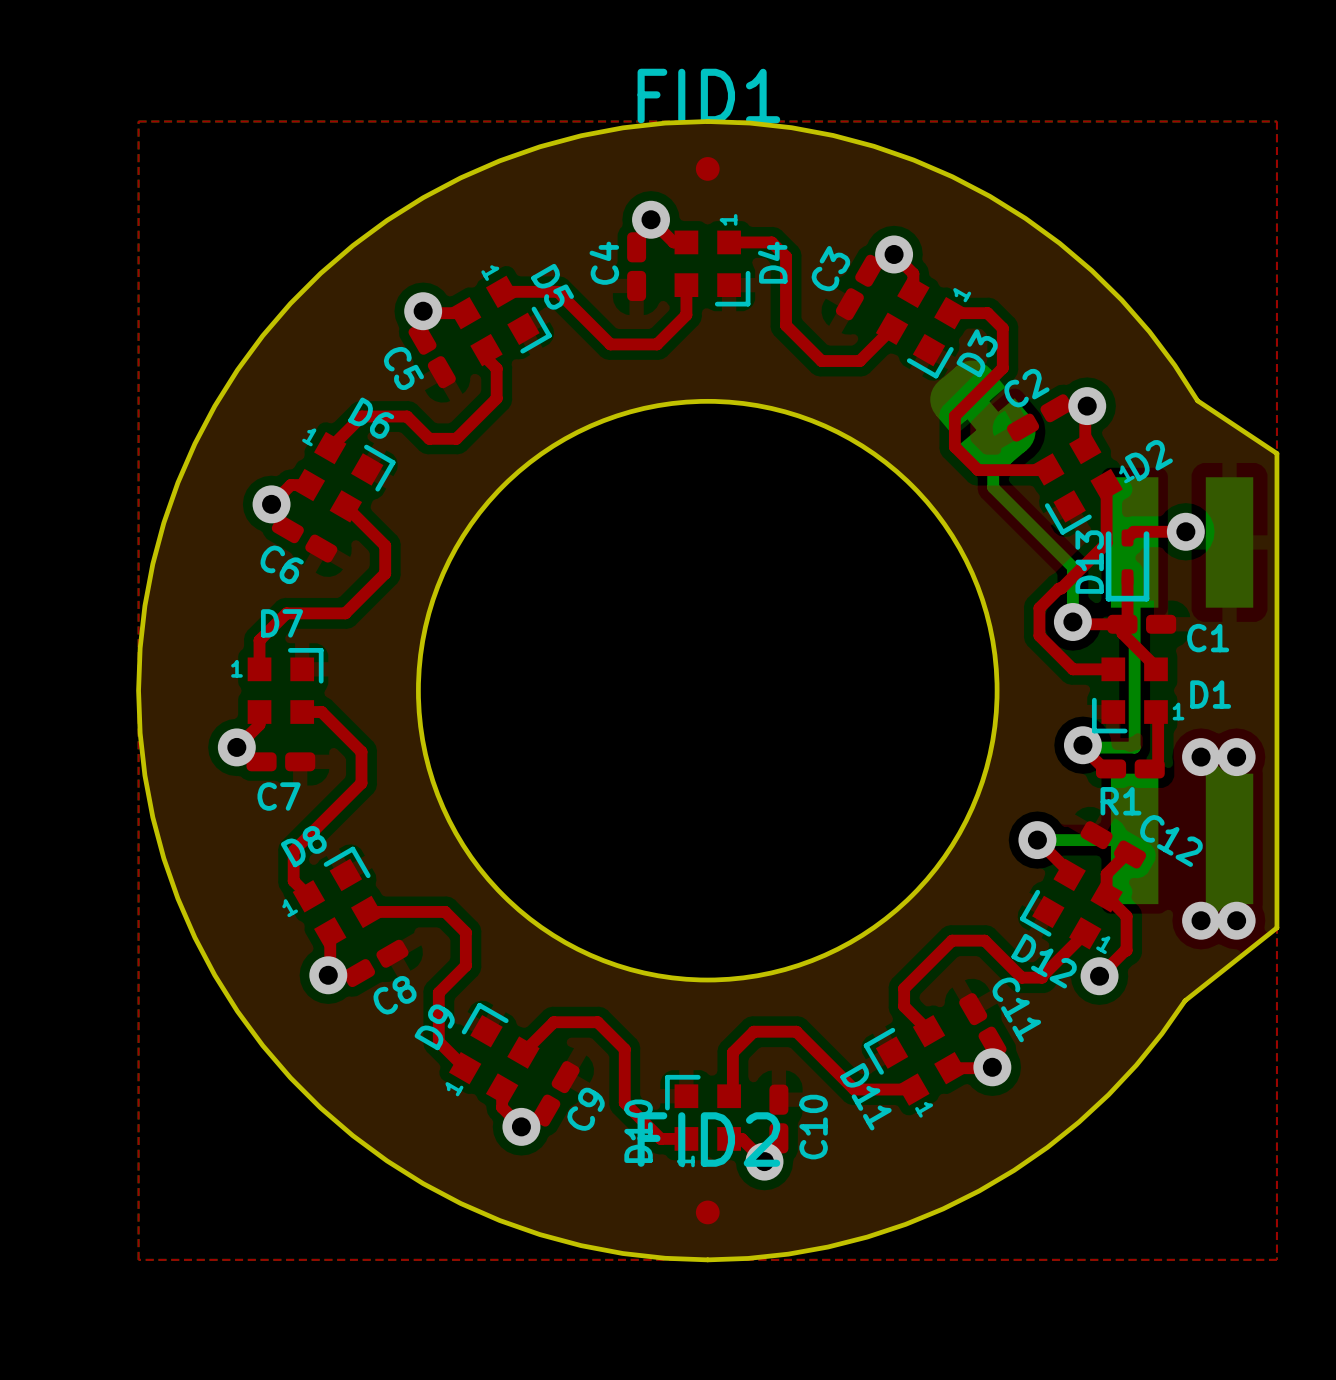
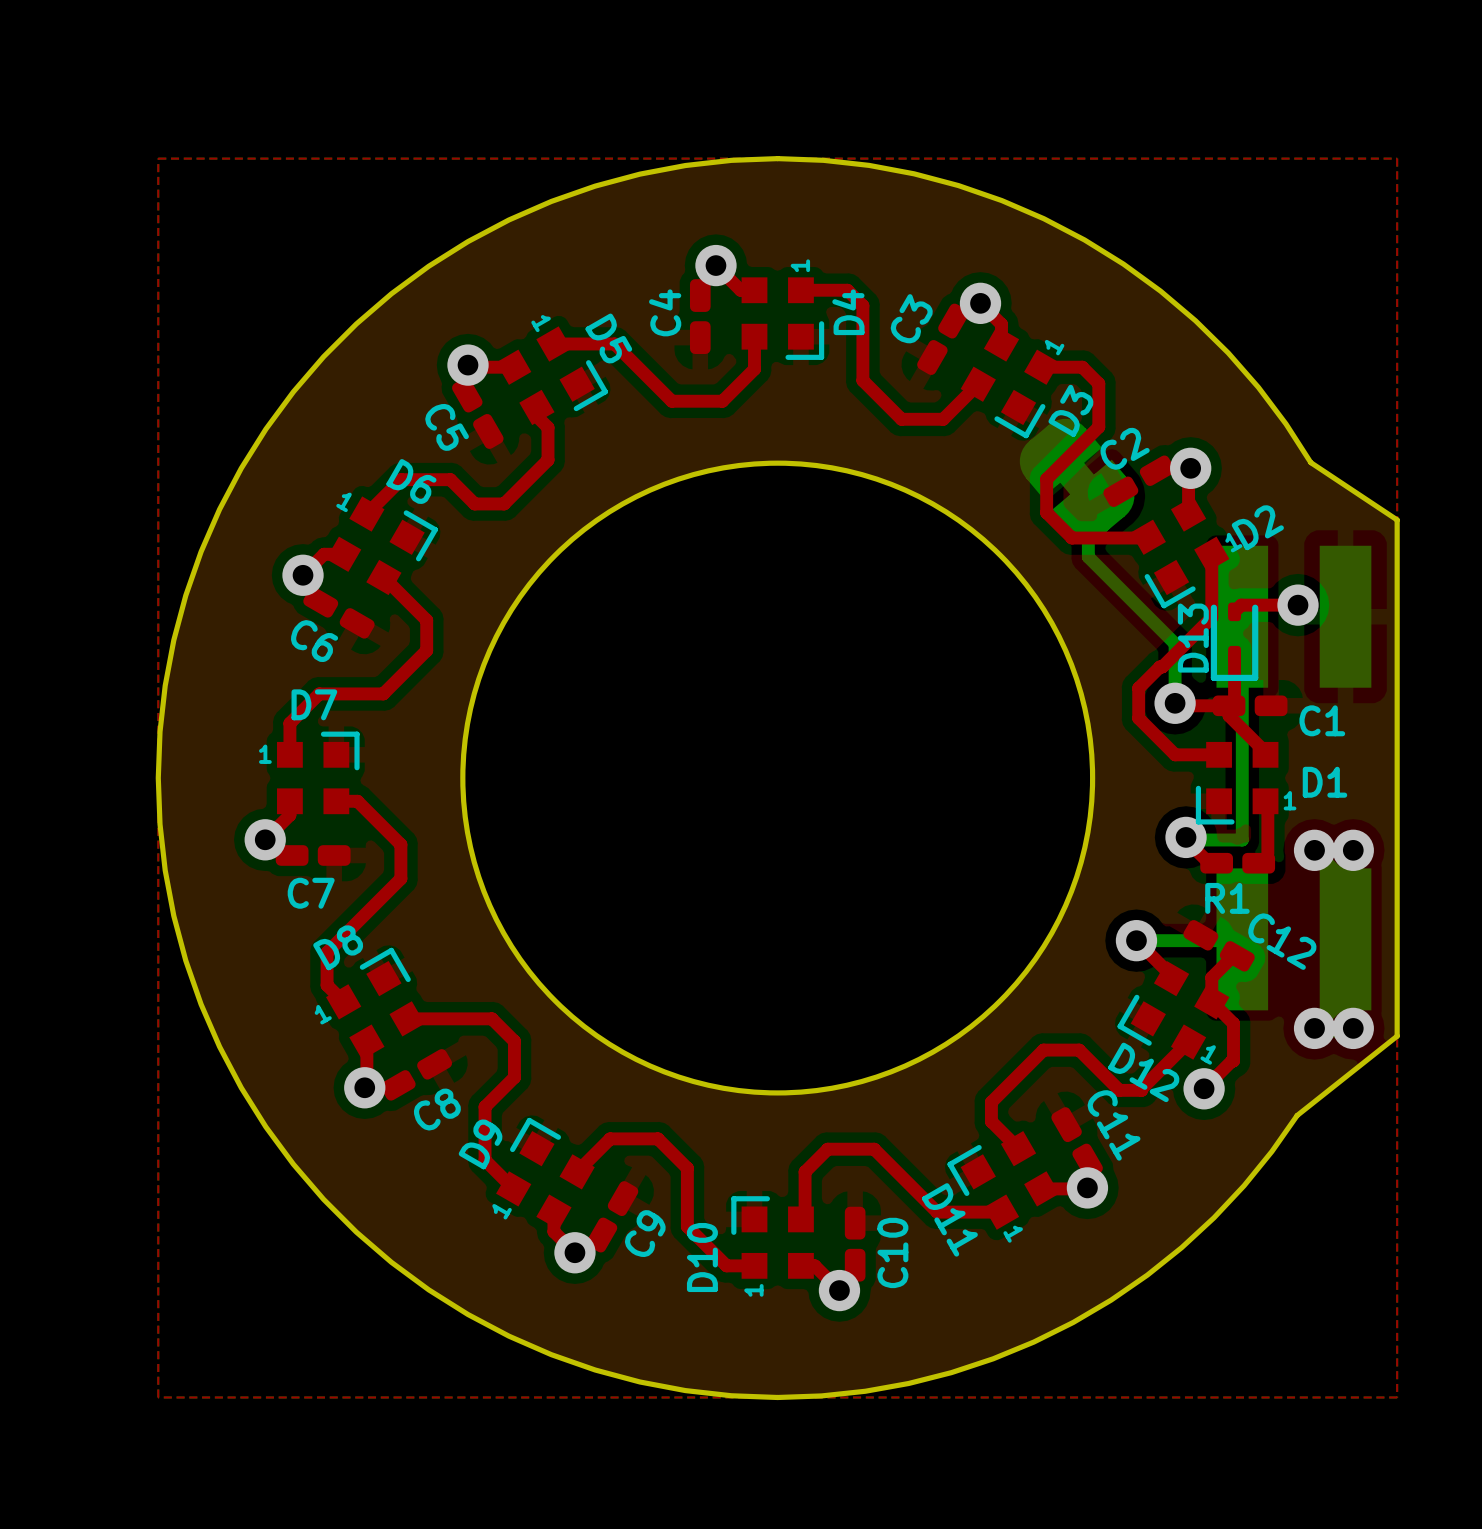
FID1: (707, 168) -> none
FID2: (707, 1212) -> none

